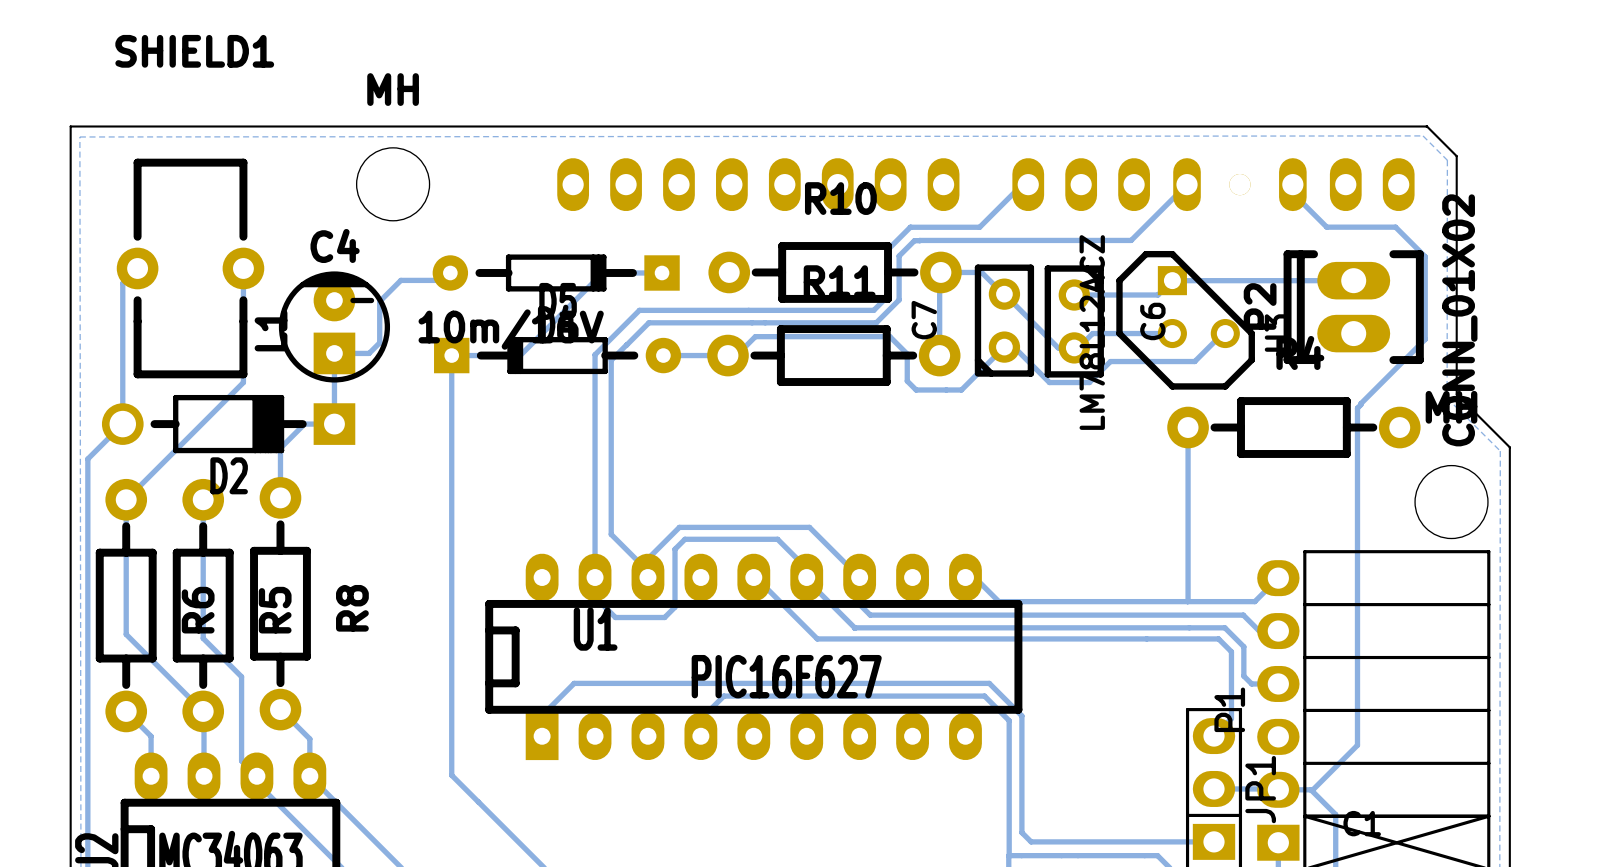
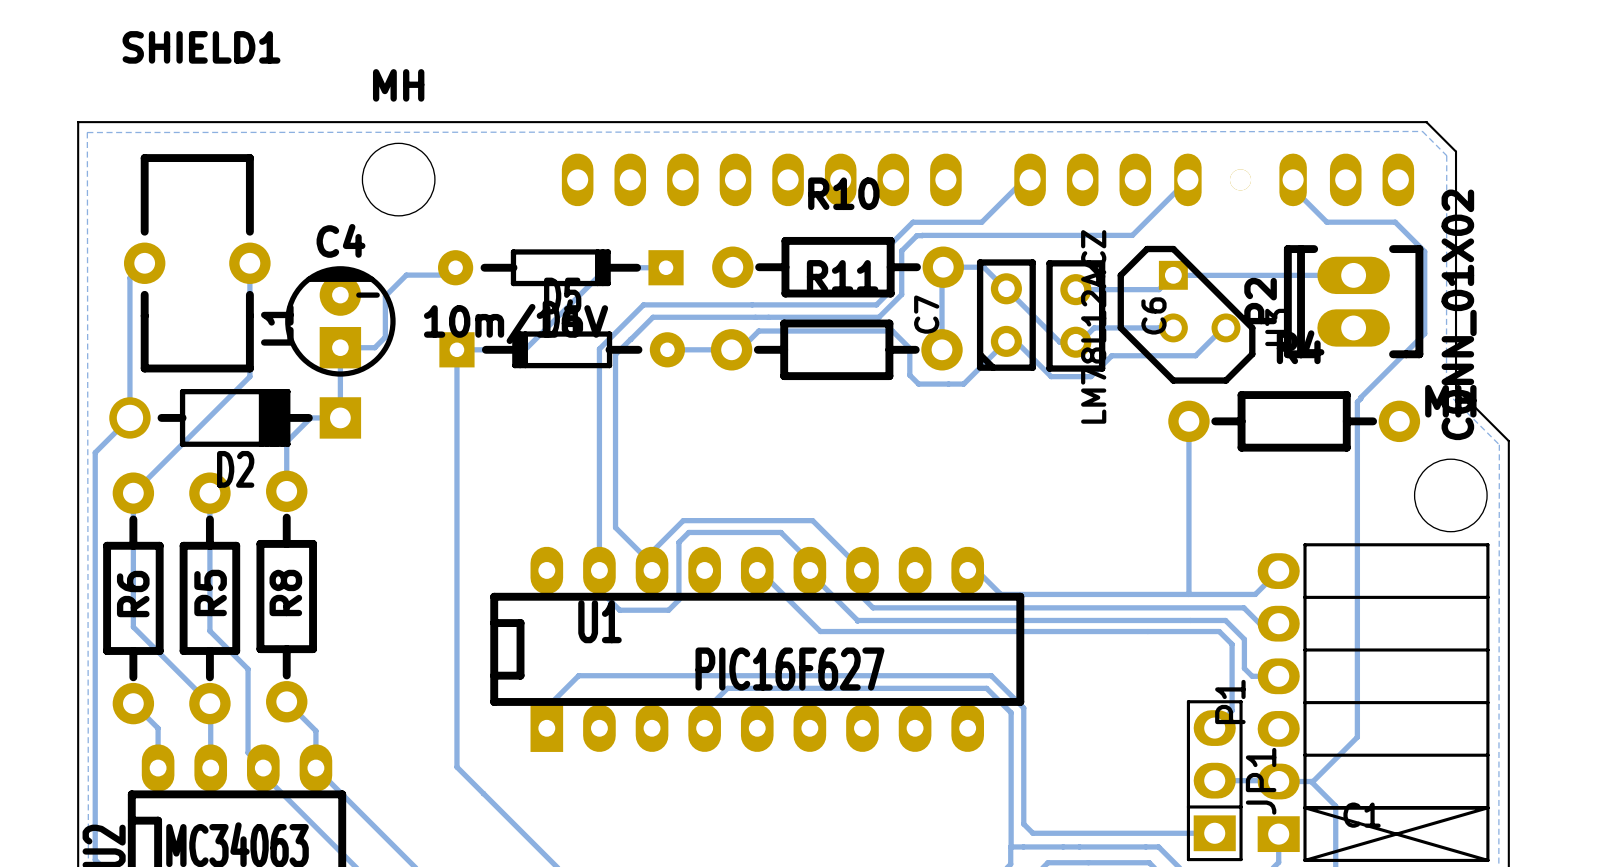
R8 name position: R8 (352, 608) -> R8 (285, 592)
R6 name position: R6 (198, 610) -> R6 (133, 594)
R5 name position: R5 (275, 610) -> R5 (210, 592)

